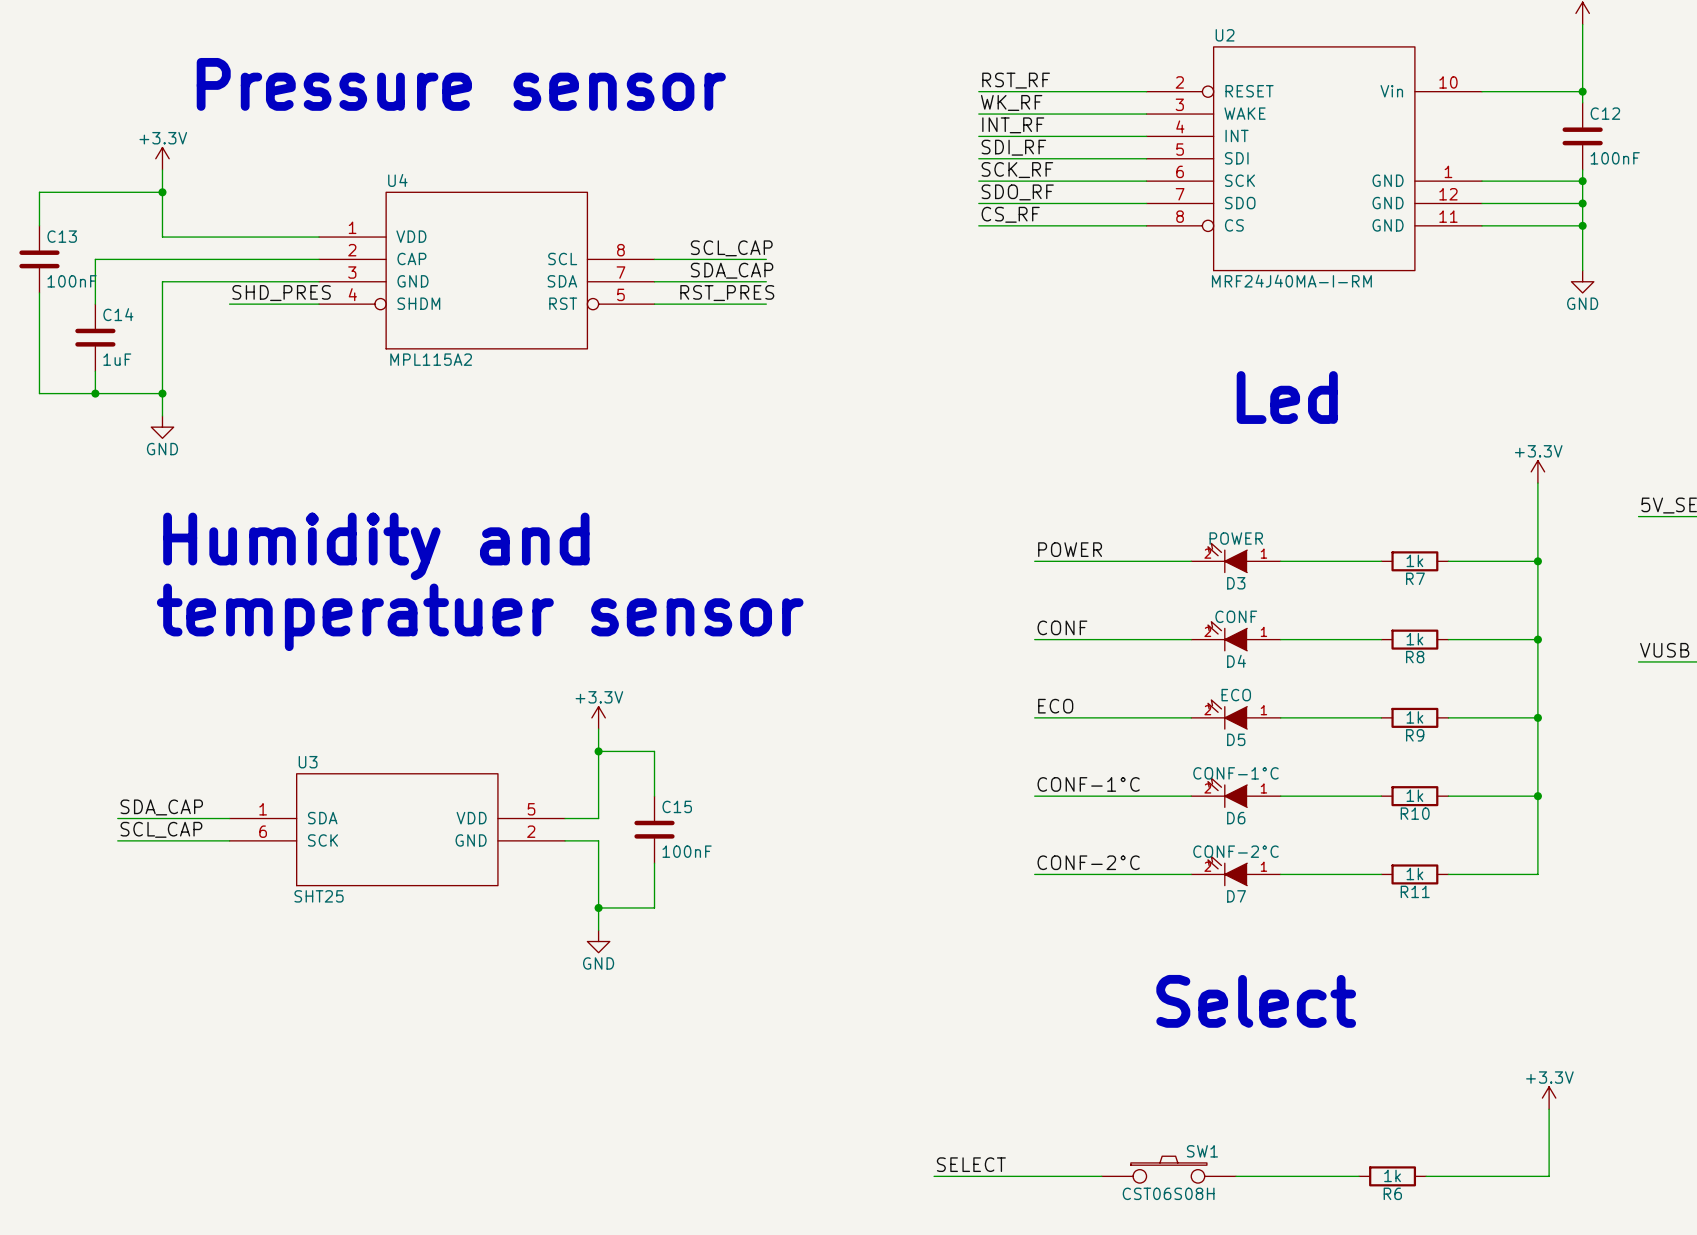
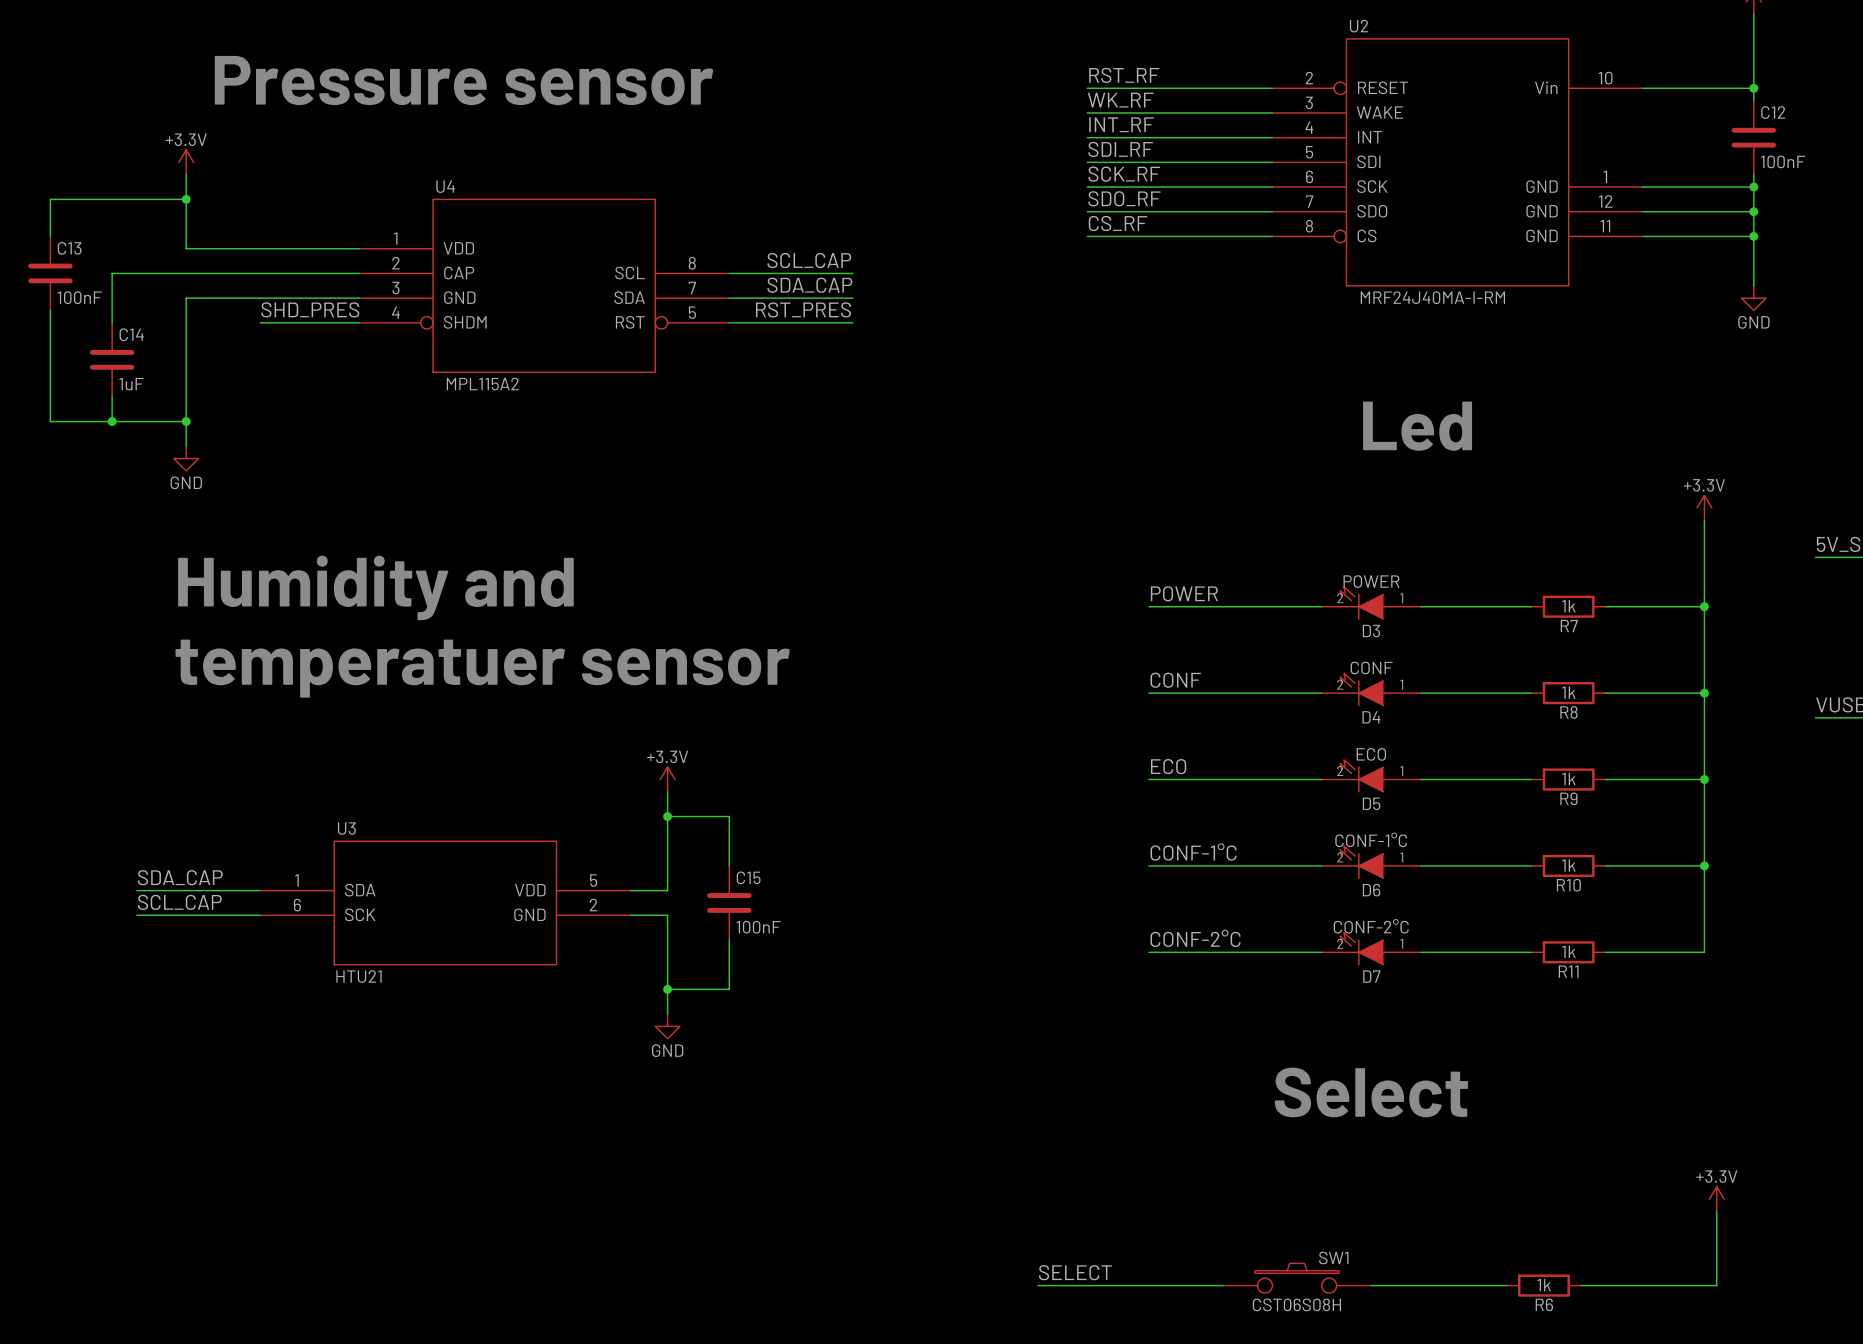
U3 value: SHT25 (319, 896) -> HTU21 (359, 976)

